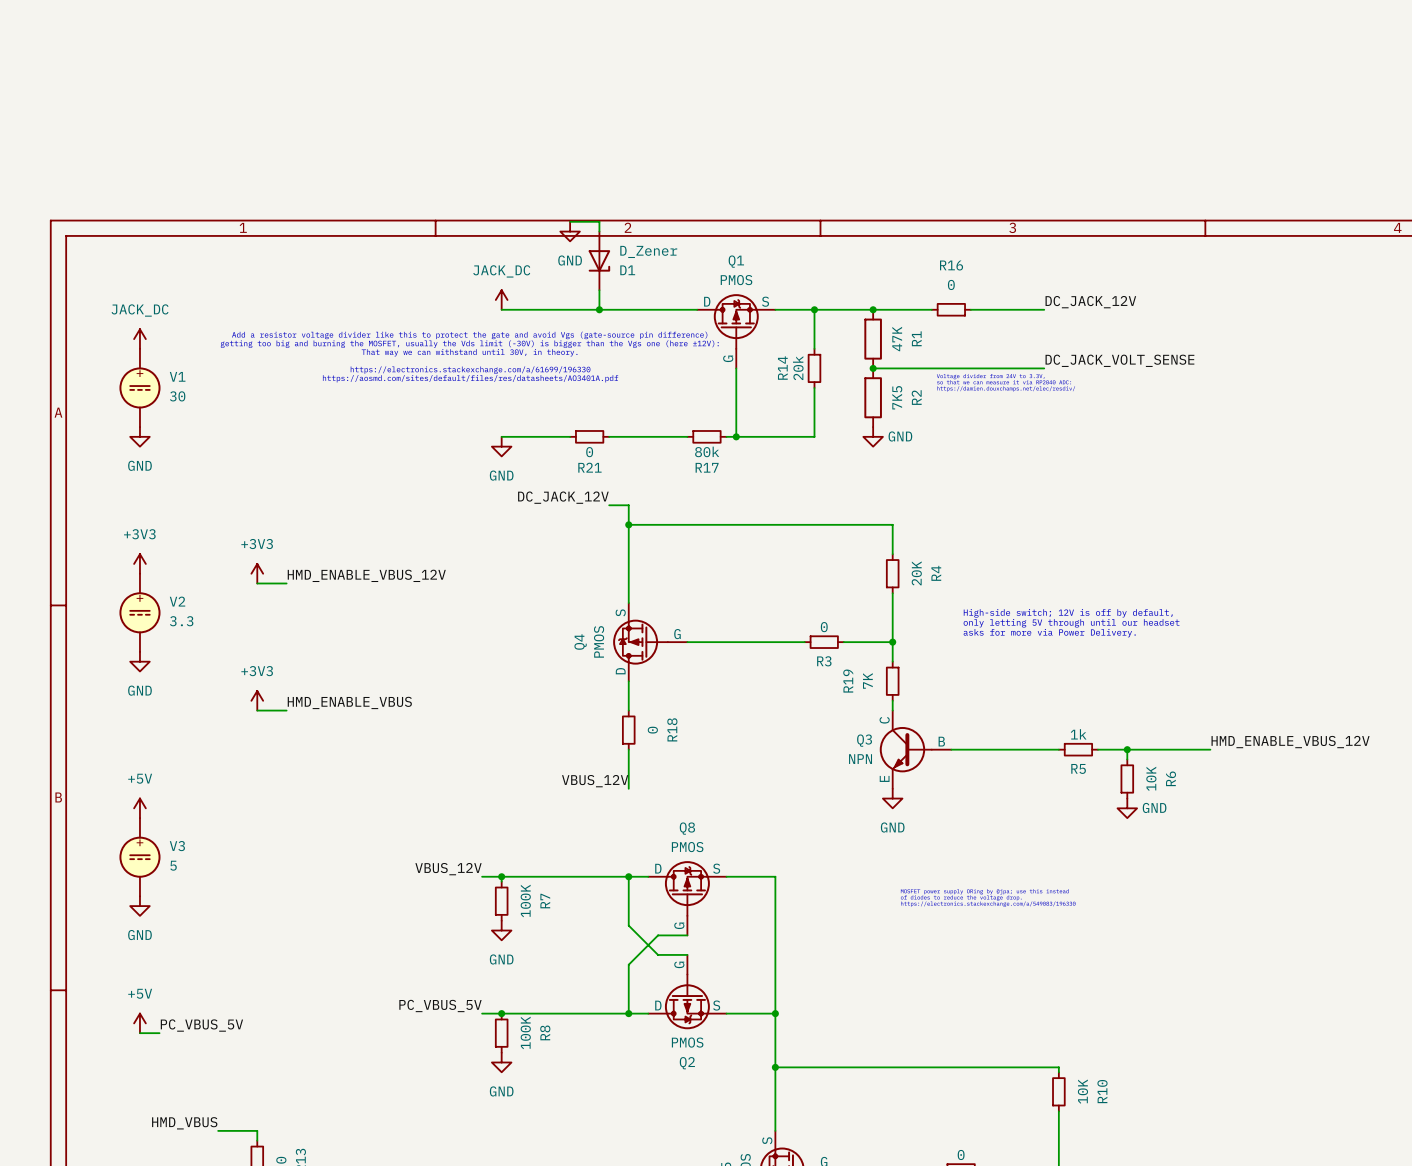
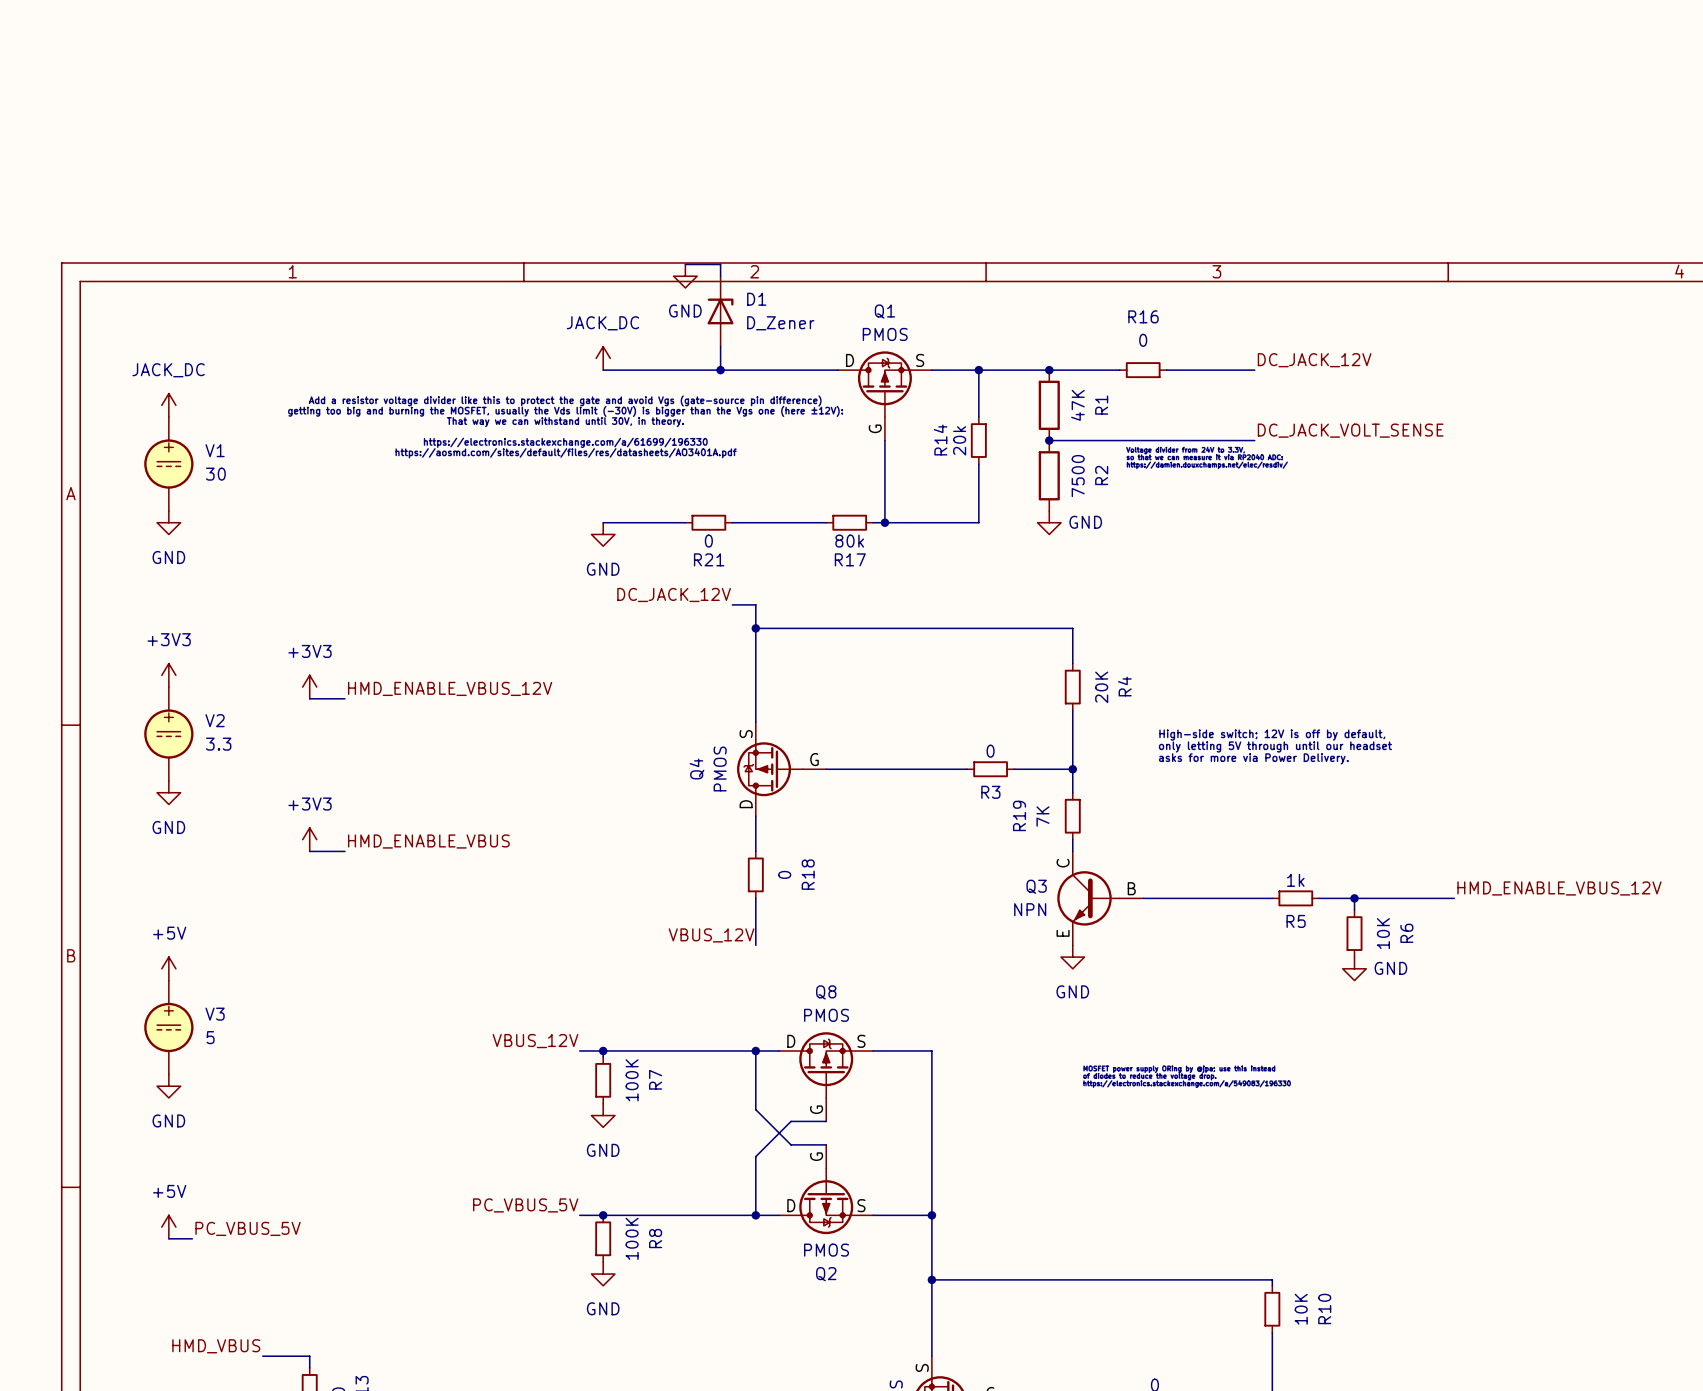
D1 flip: as is (599, 260) -> up-down (720, 311)
R2 value: 7K5 (897, 397) -> 7500 (1078, 476)

